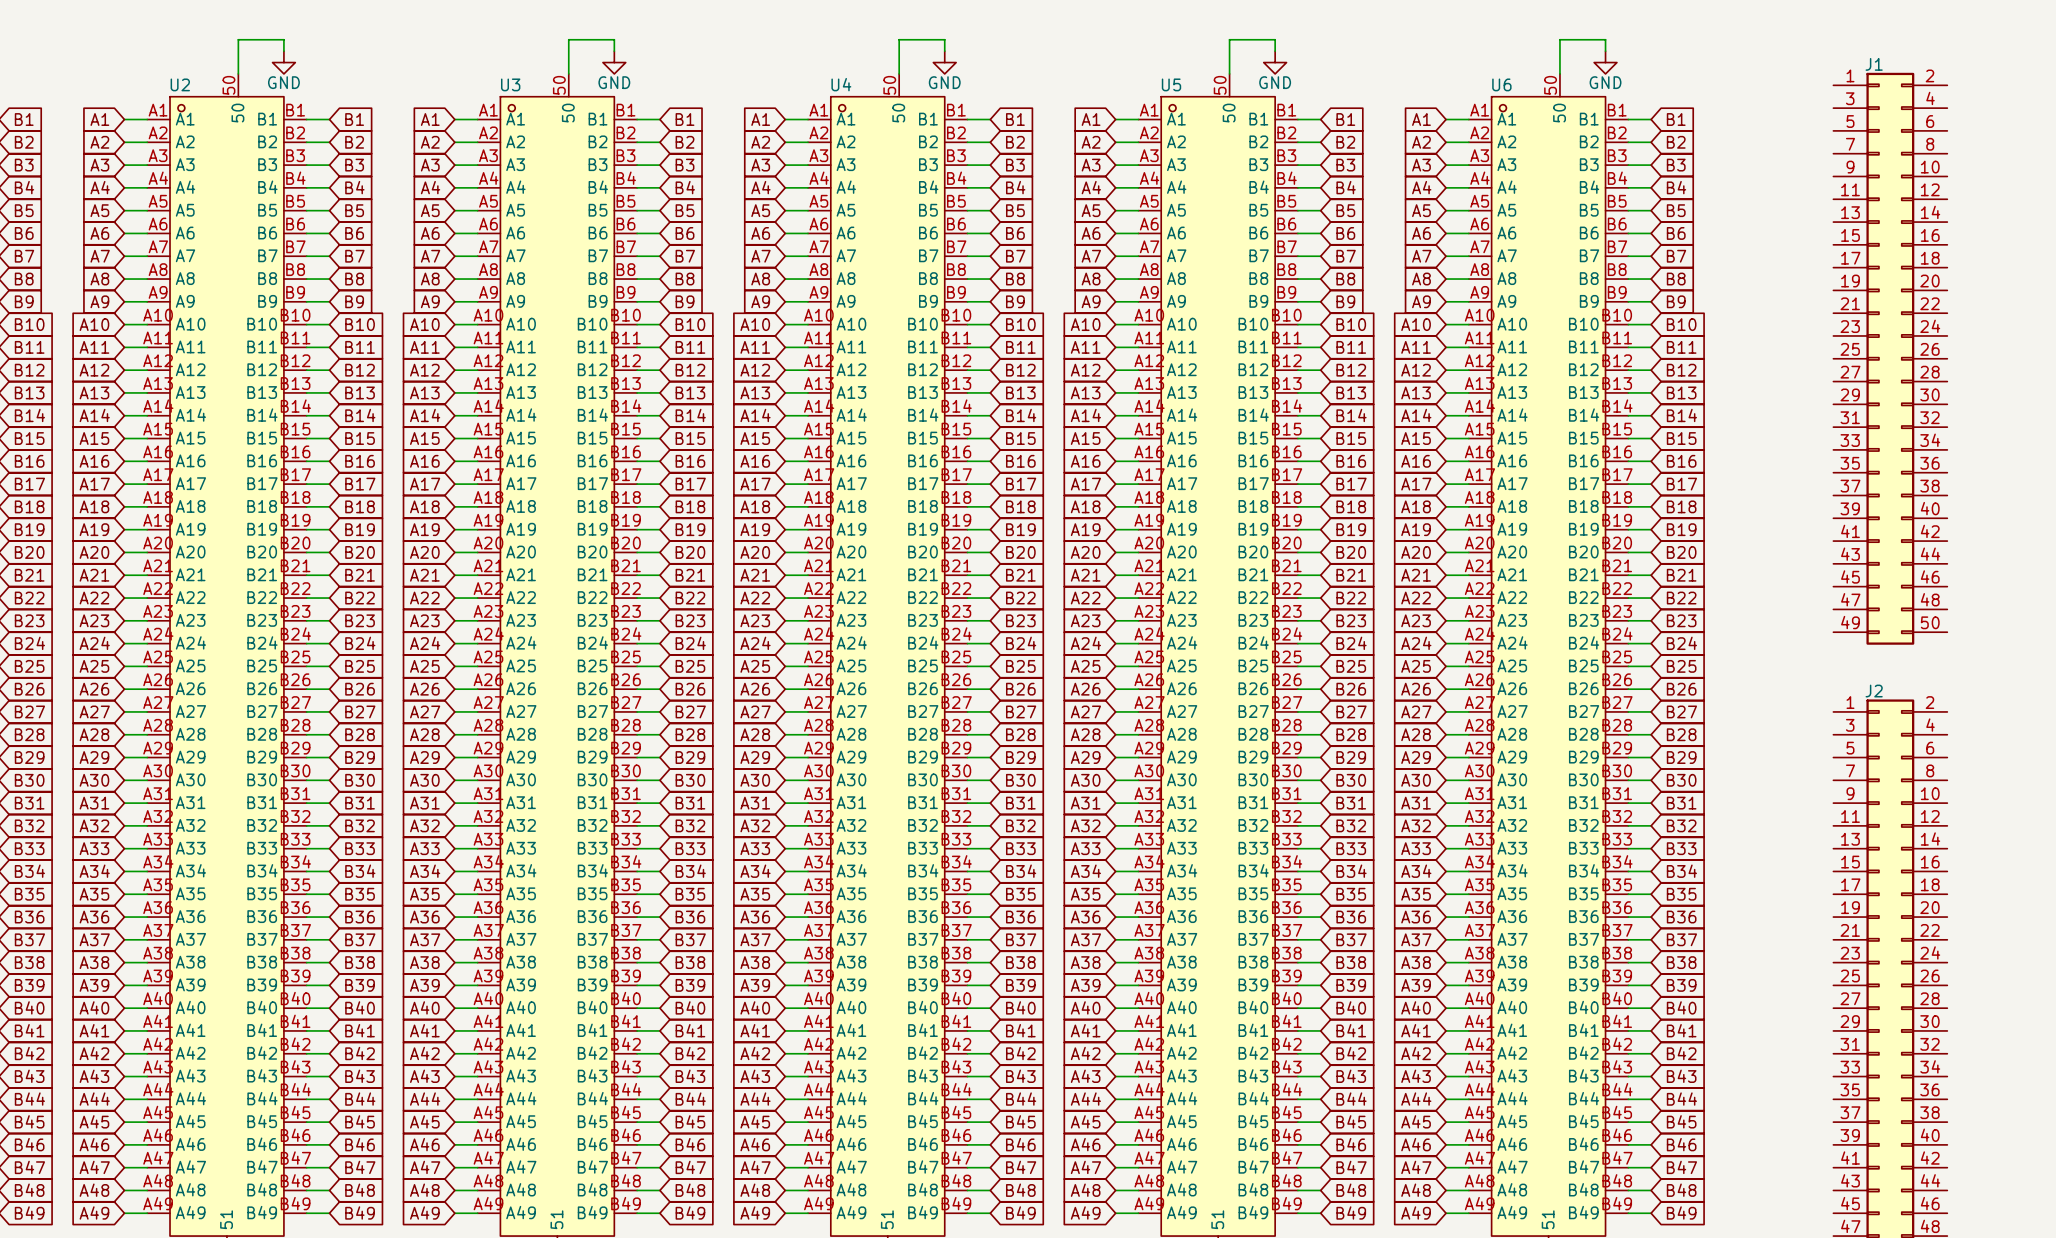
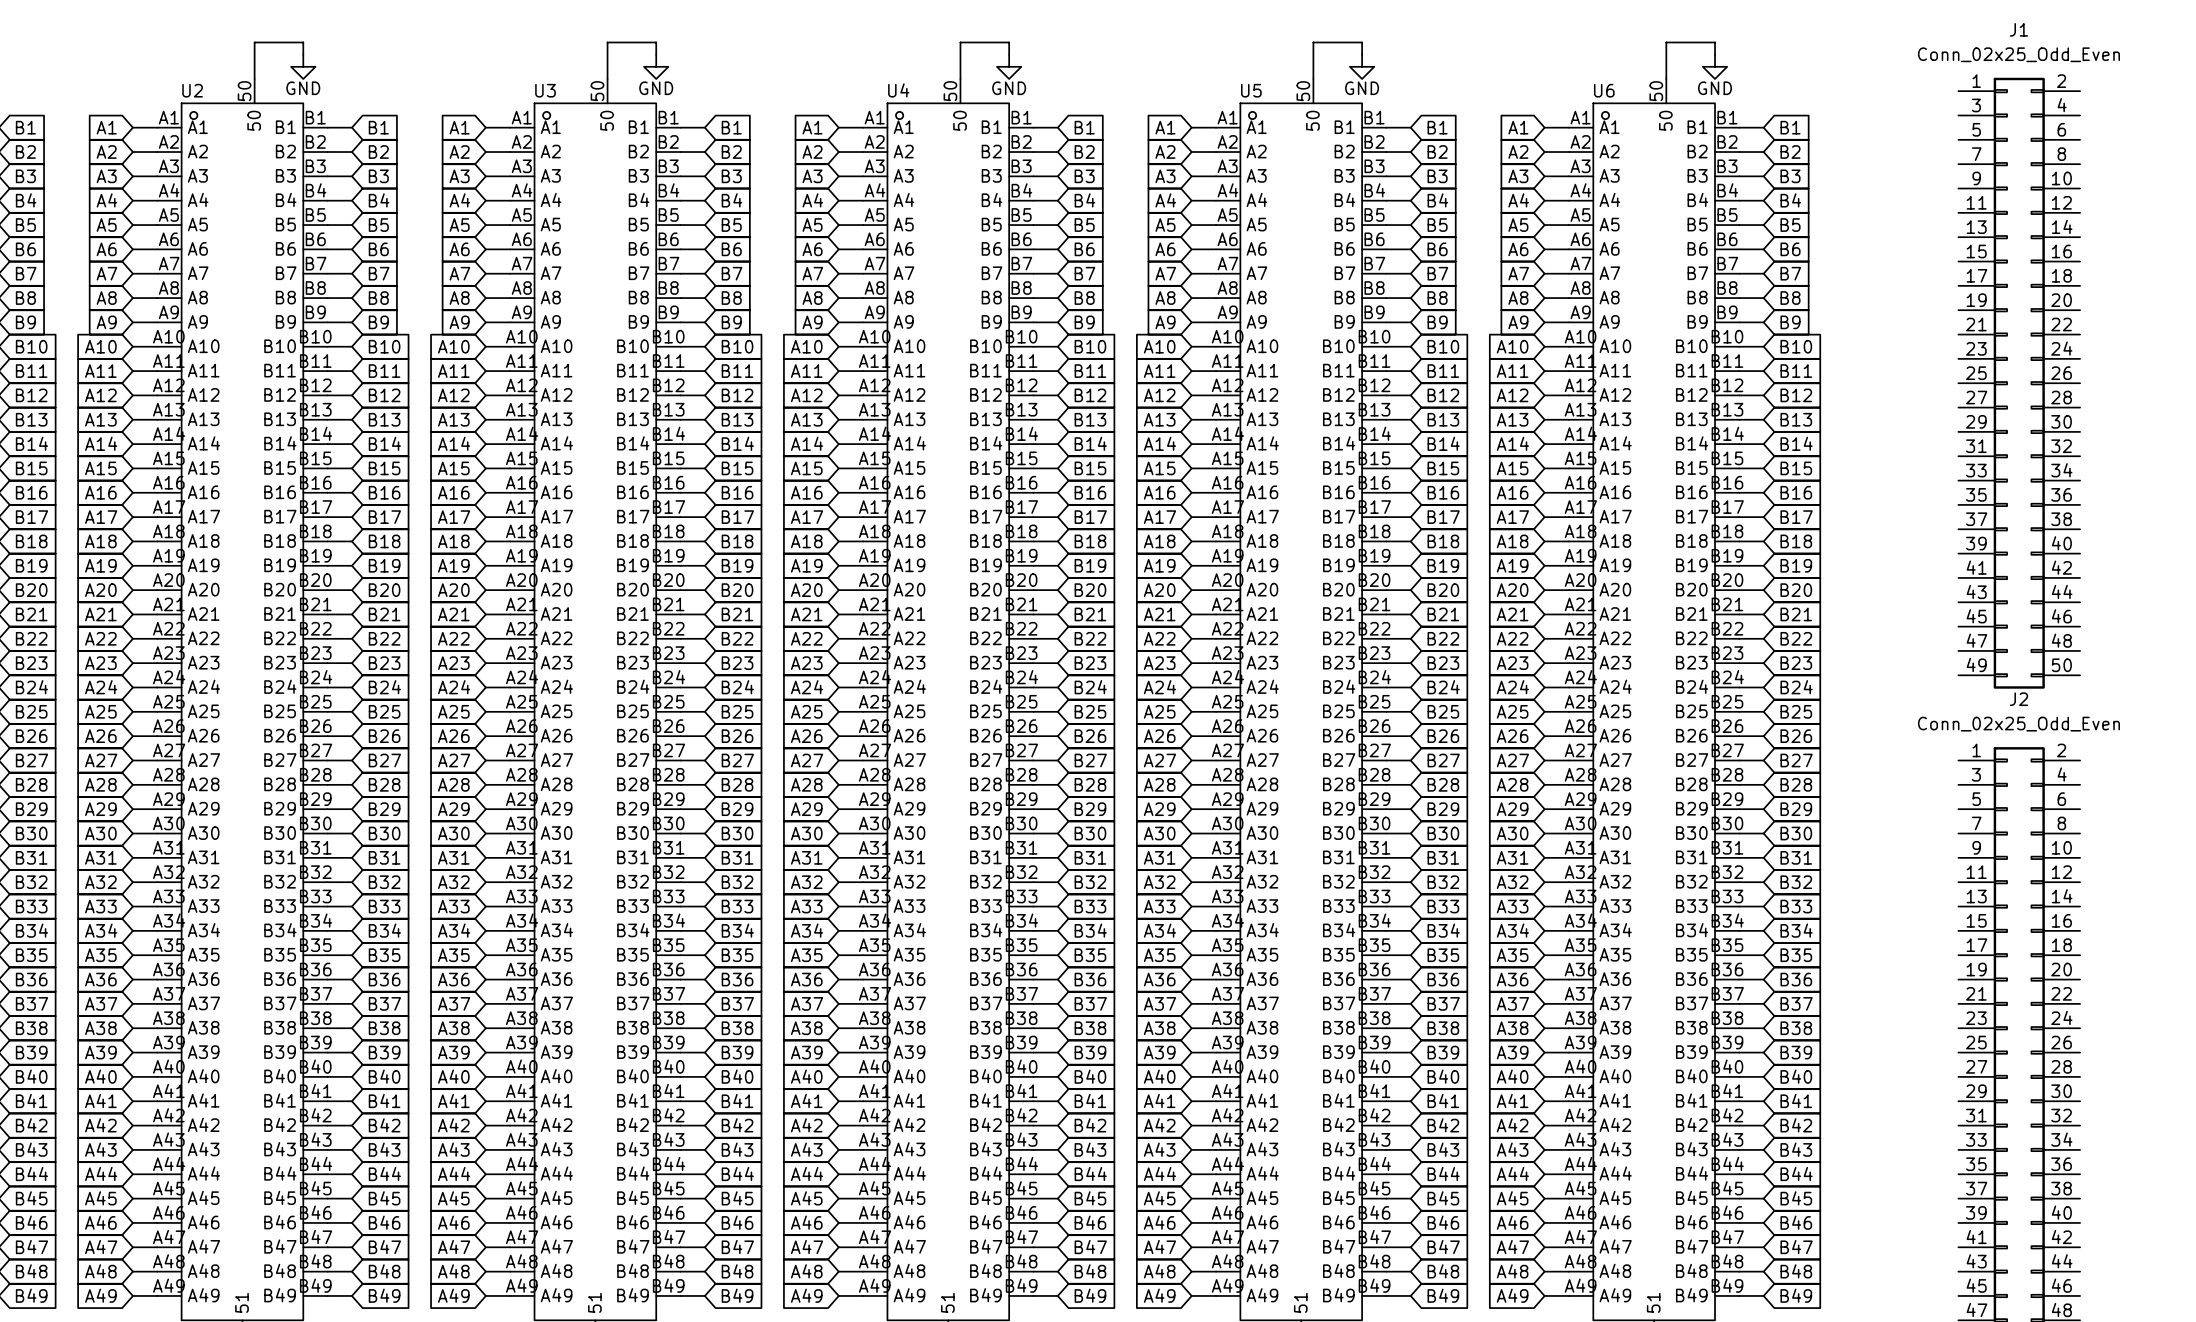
J1 value: none -> Conn_02x25_Odd_Even (2018, 54)
J1 name position: J1 (1874, 64) -> J1 (2018, 29)
J2 value: none -> Conn_02x25_Odd_Even (2018, 724)
J2 name position: J2 (1874, 691) -> J2 (2018, 699)

